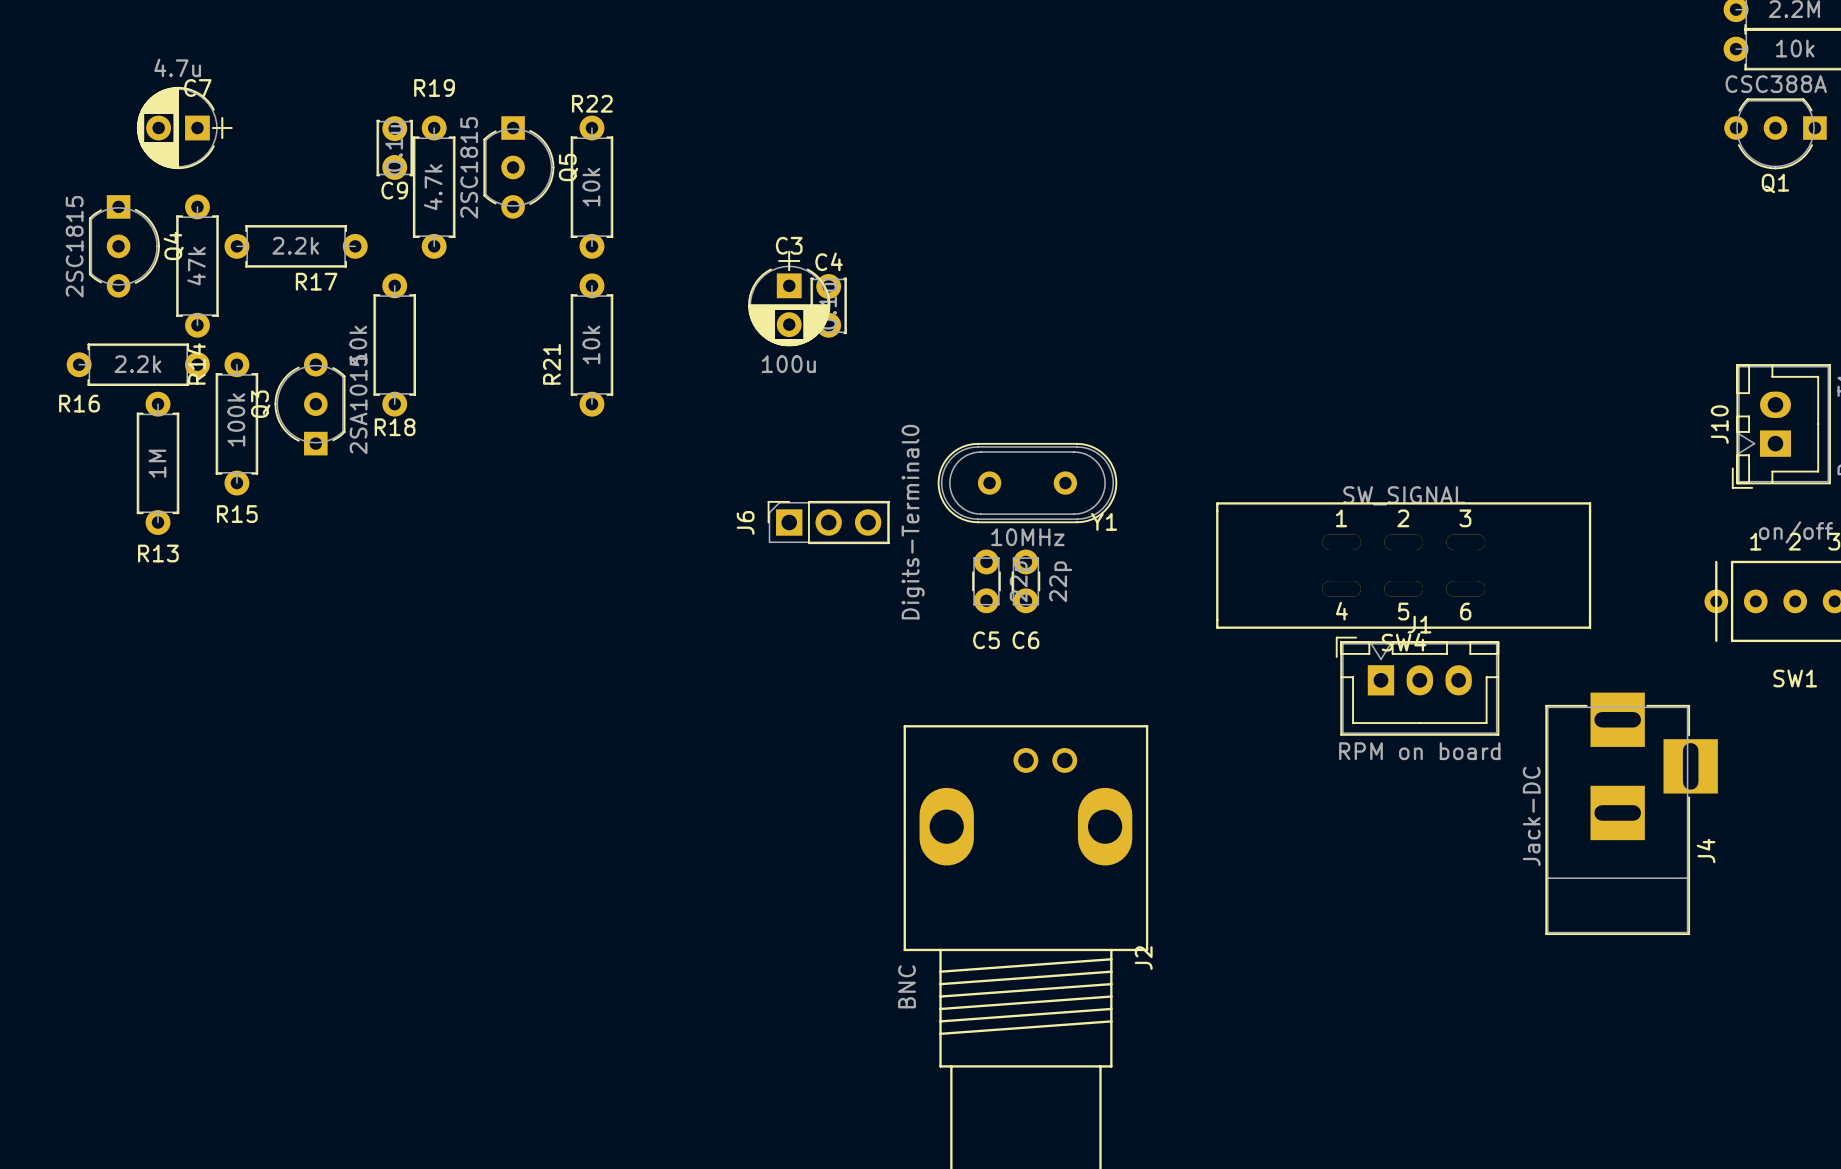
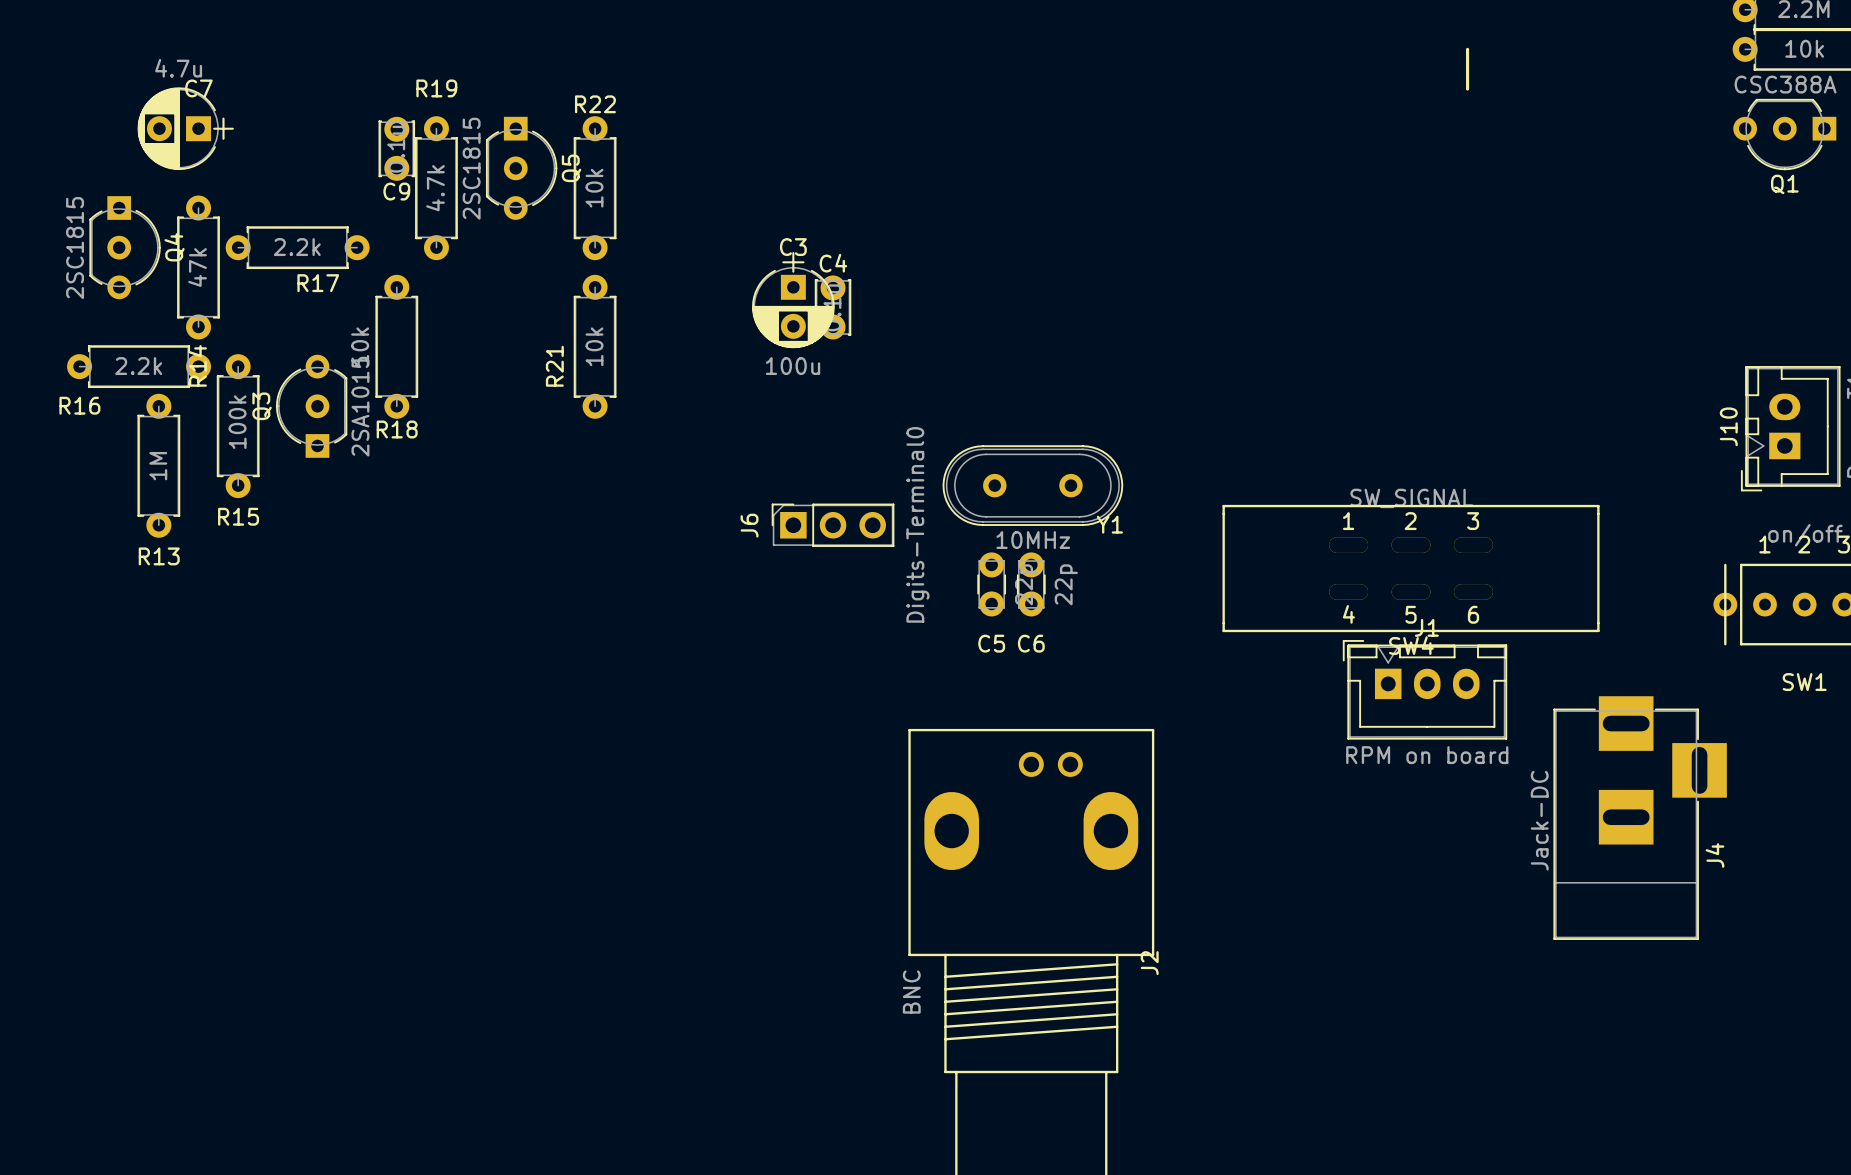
line: none -> (1467, 49) (1467, 89)

